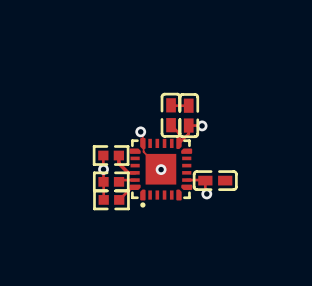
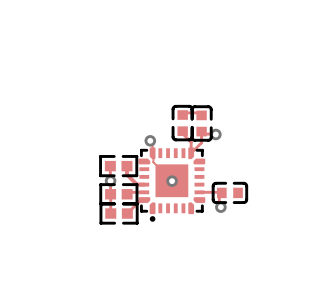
part footprint: [160, 92, 182, 138] -> [171, 104, 194, 142]
part footprint: [178, 93, 200, 139] -> [190, 105, 213, 142]
part footprint: [192, 170, 238, 191] -> [211, 181, 249, 204]

